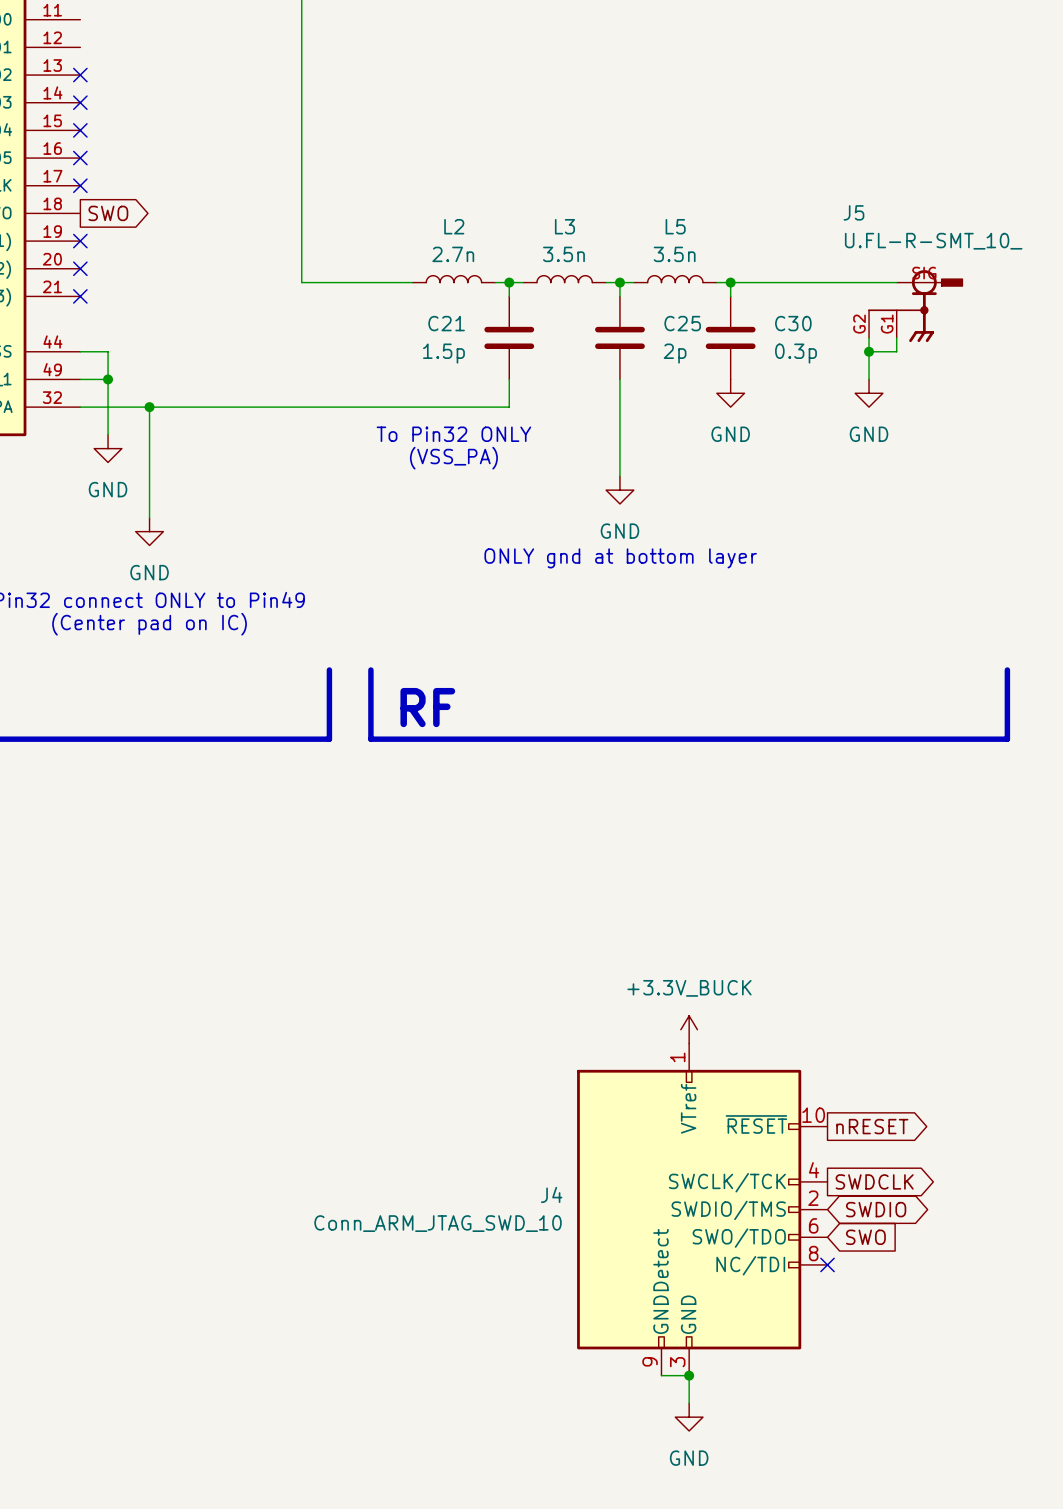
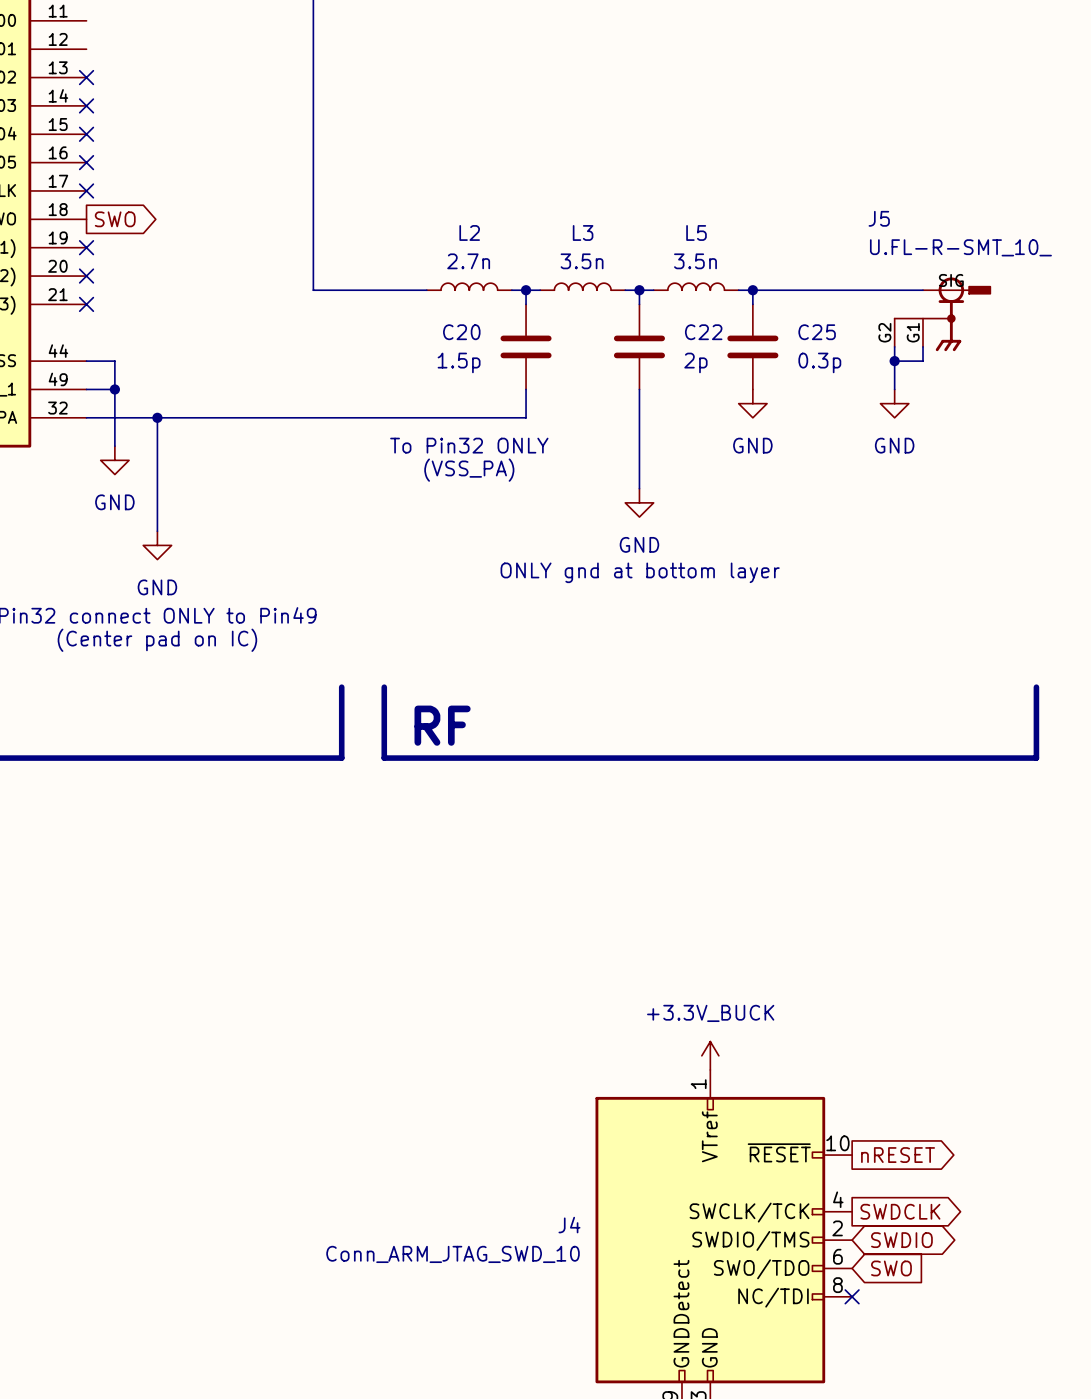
C21 name: C21 (446, 323) -> C20 (461, 332)
C25 name: C25 (682, 323) -> C22 (703, 332)
C30 name: C30 (793, 323) -> C25 (817, 332)

